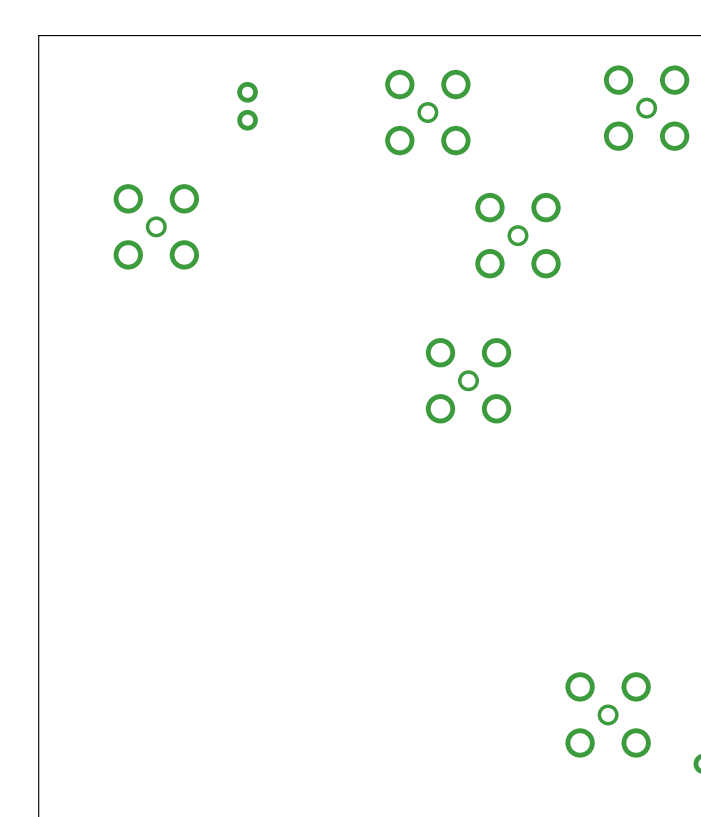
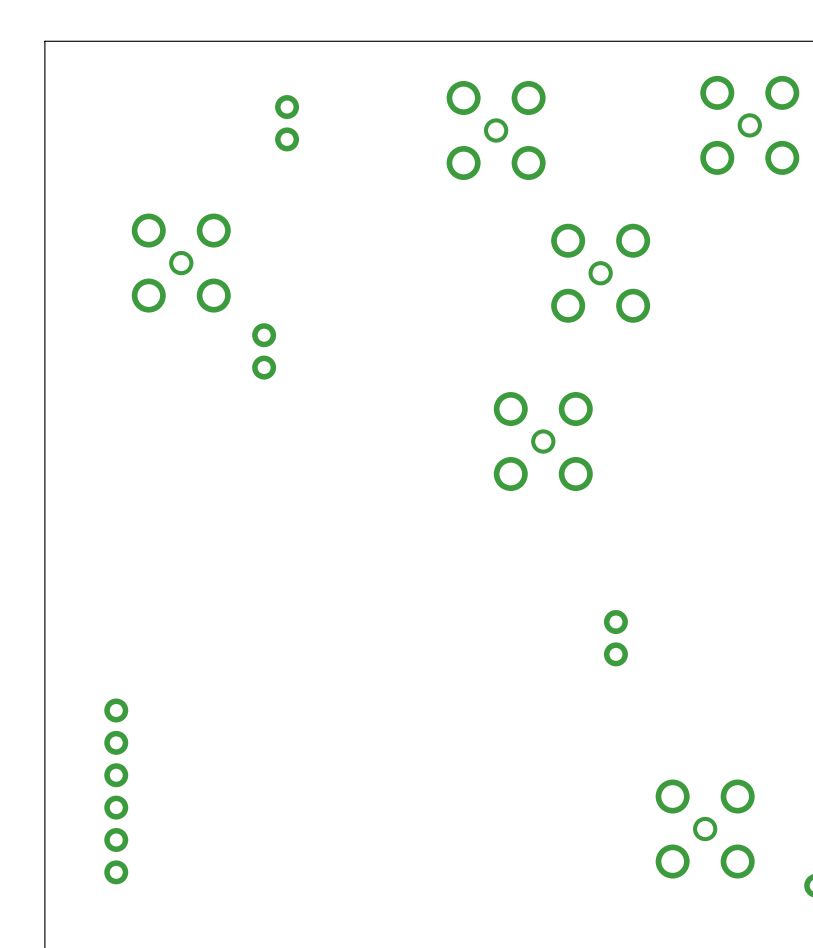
part: none -> (264, 351)
part: none -> (615, 638)
part: none -> (116, 791)

